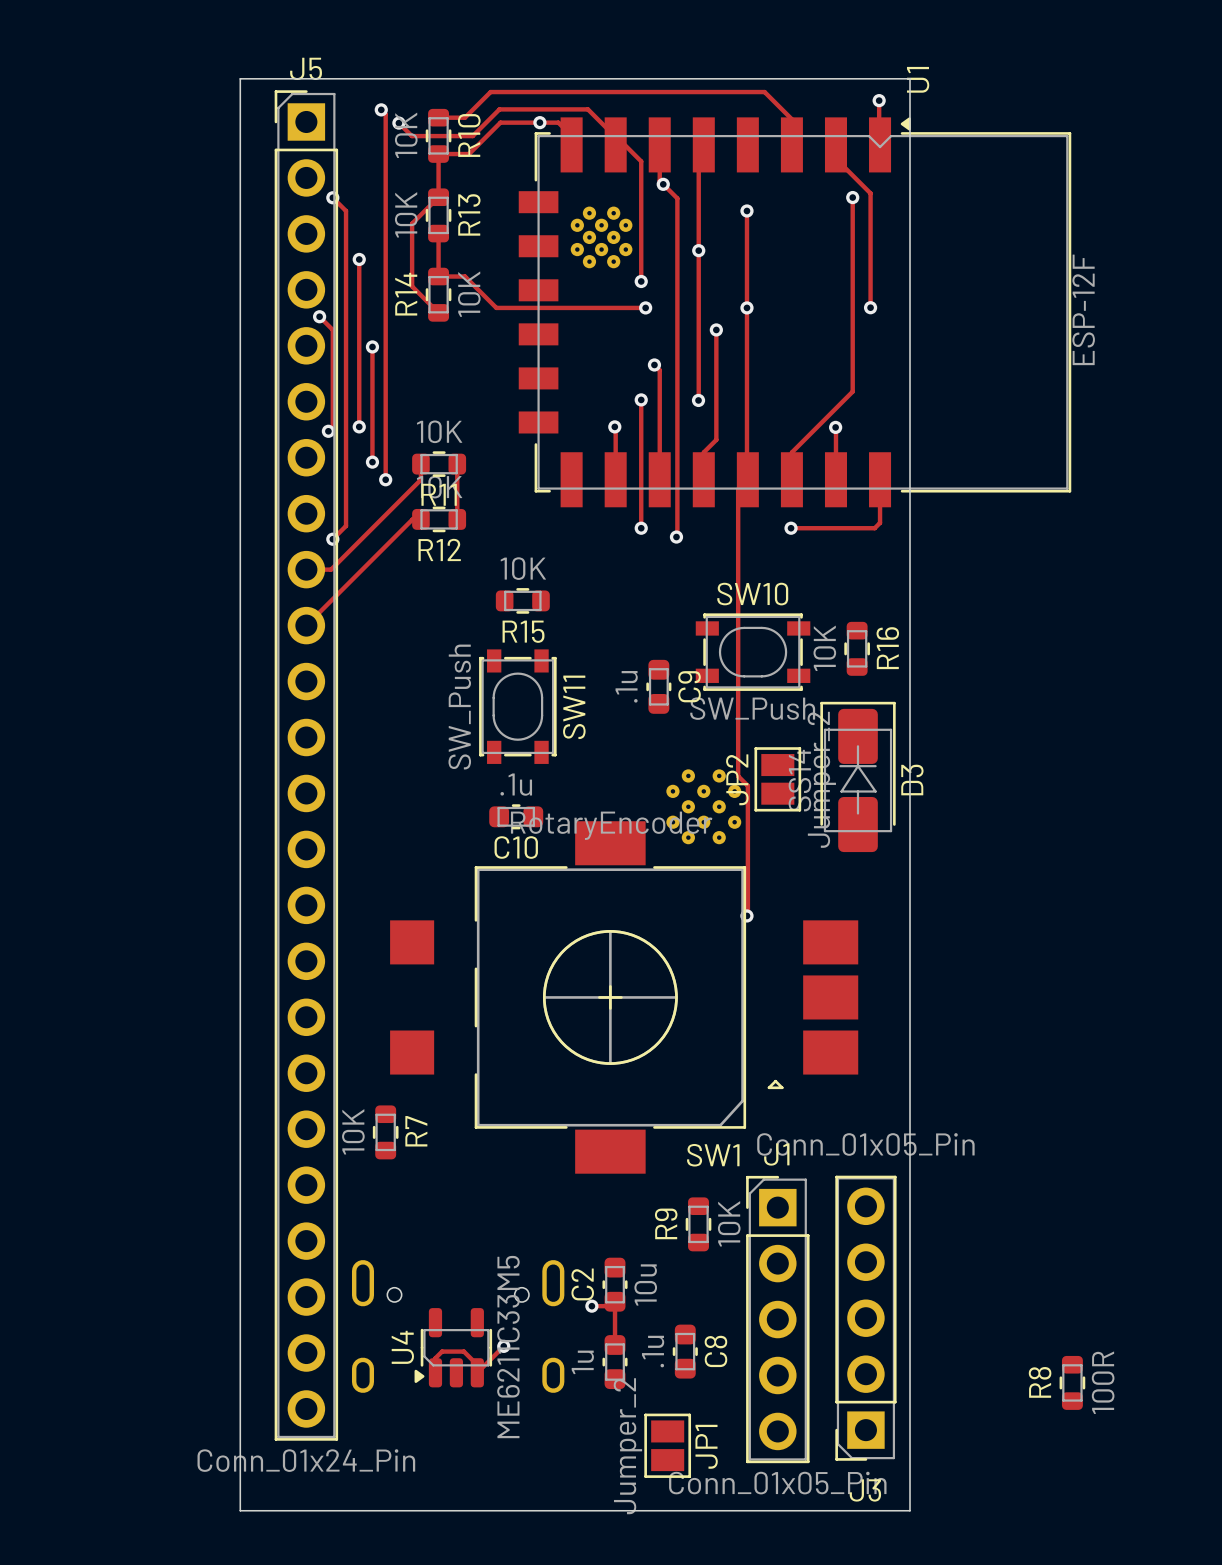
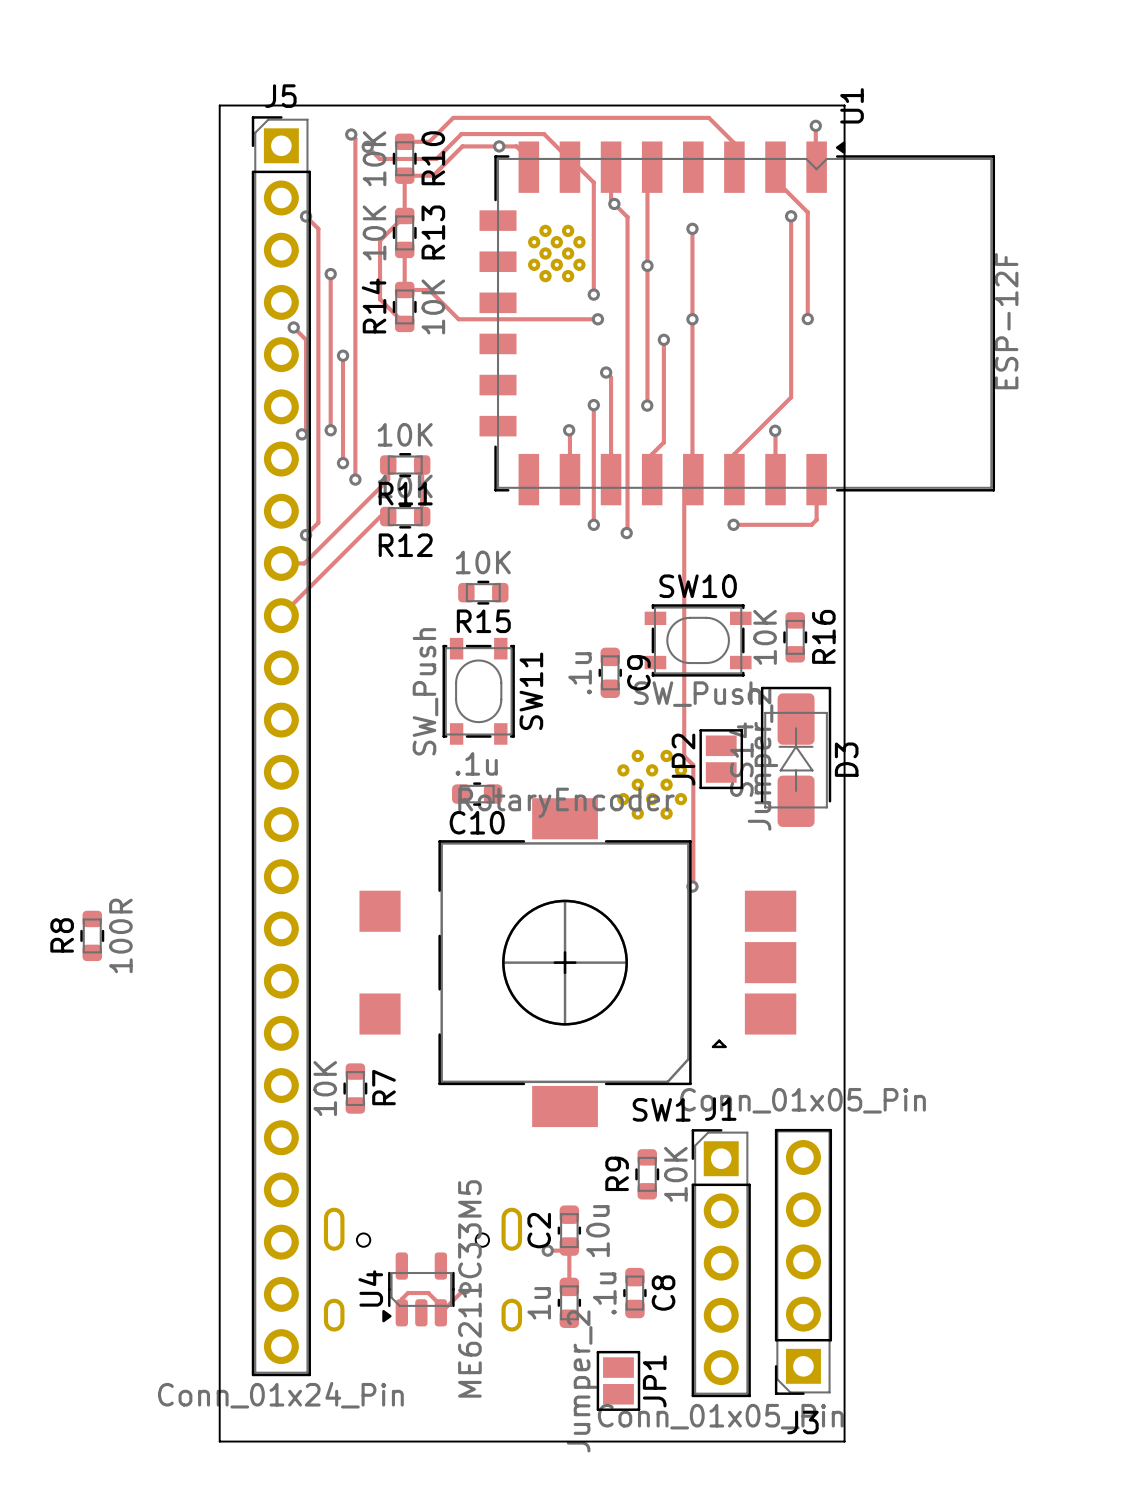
R8 position: (1072, 1382) -> (92, 935)

